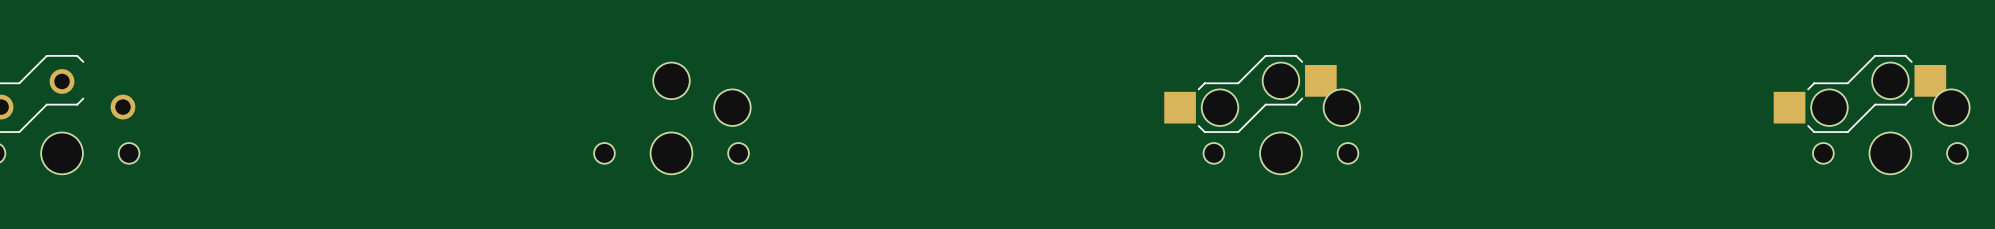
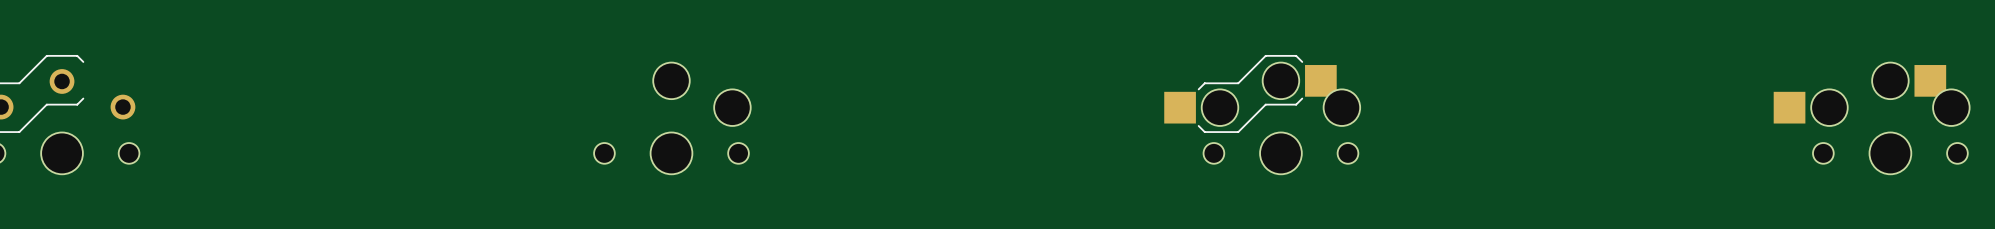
part footprint: [1773, 55, 1970, 175] -> [1773, 62, 1970, 175]

